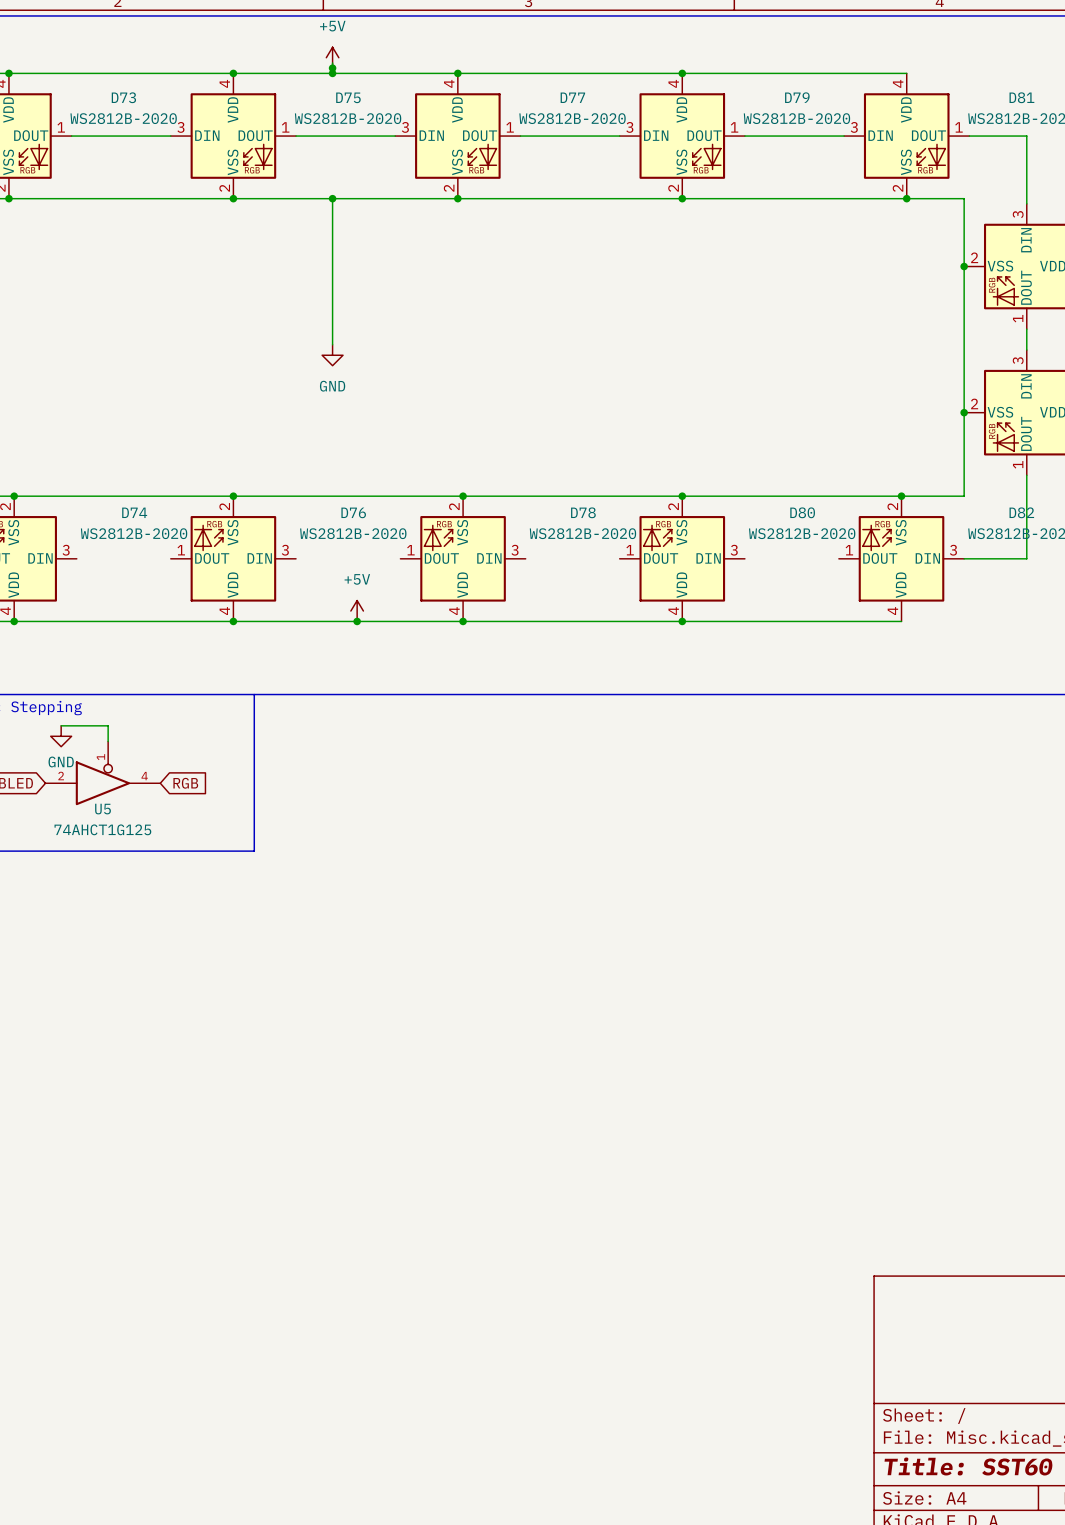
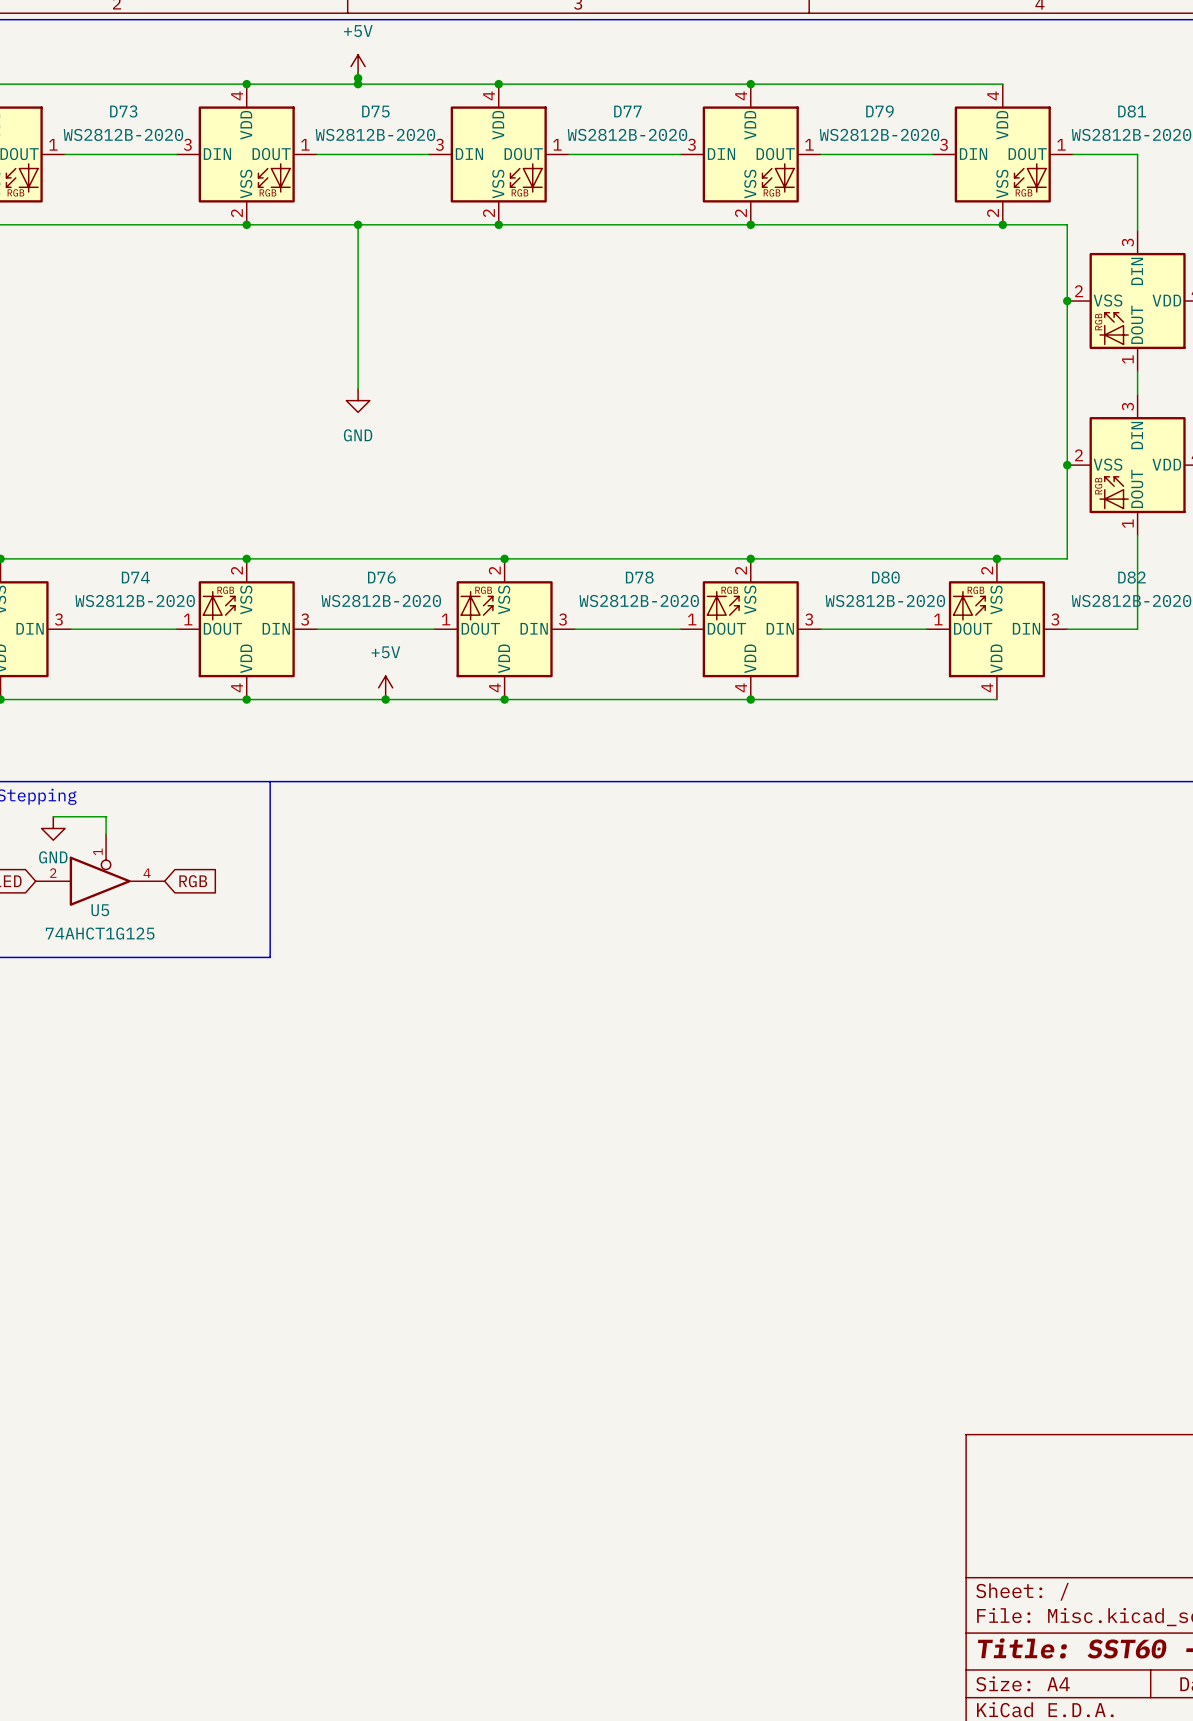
wire: none -> (70, 629) (176, 629)
wire: none -> (317, 629) (434, 629)
wire: none -> (574, 629) (680, 629)
wire: none -> (821, 629) (926, 629)

